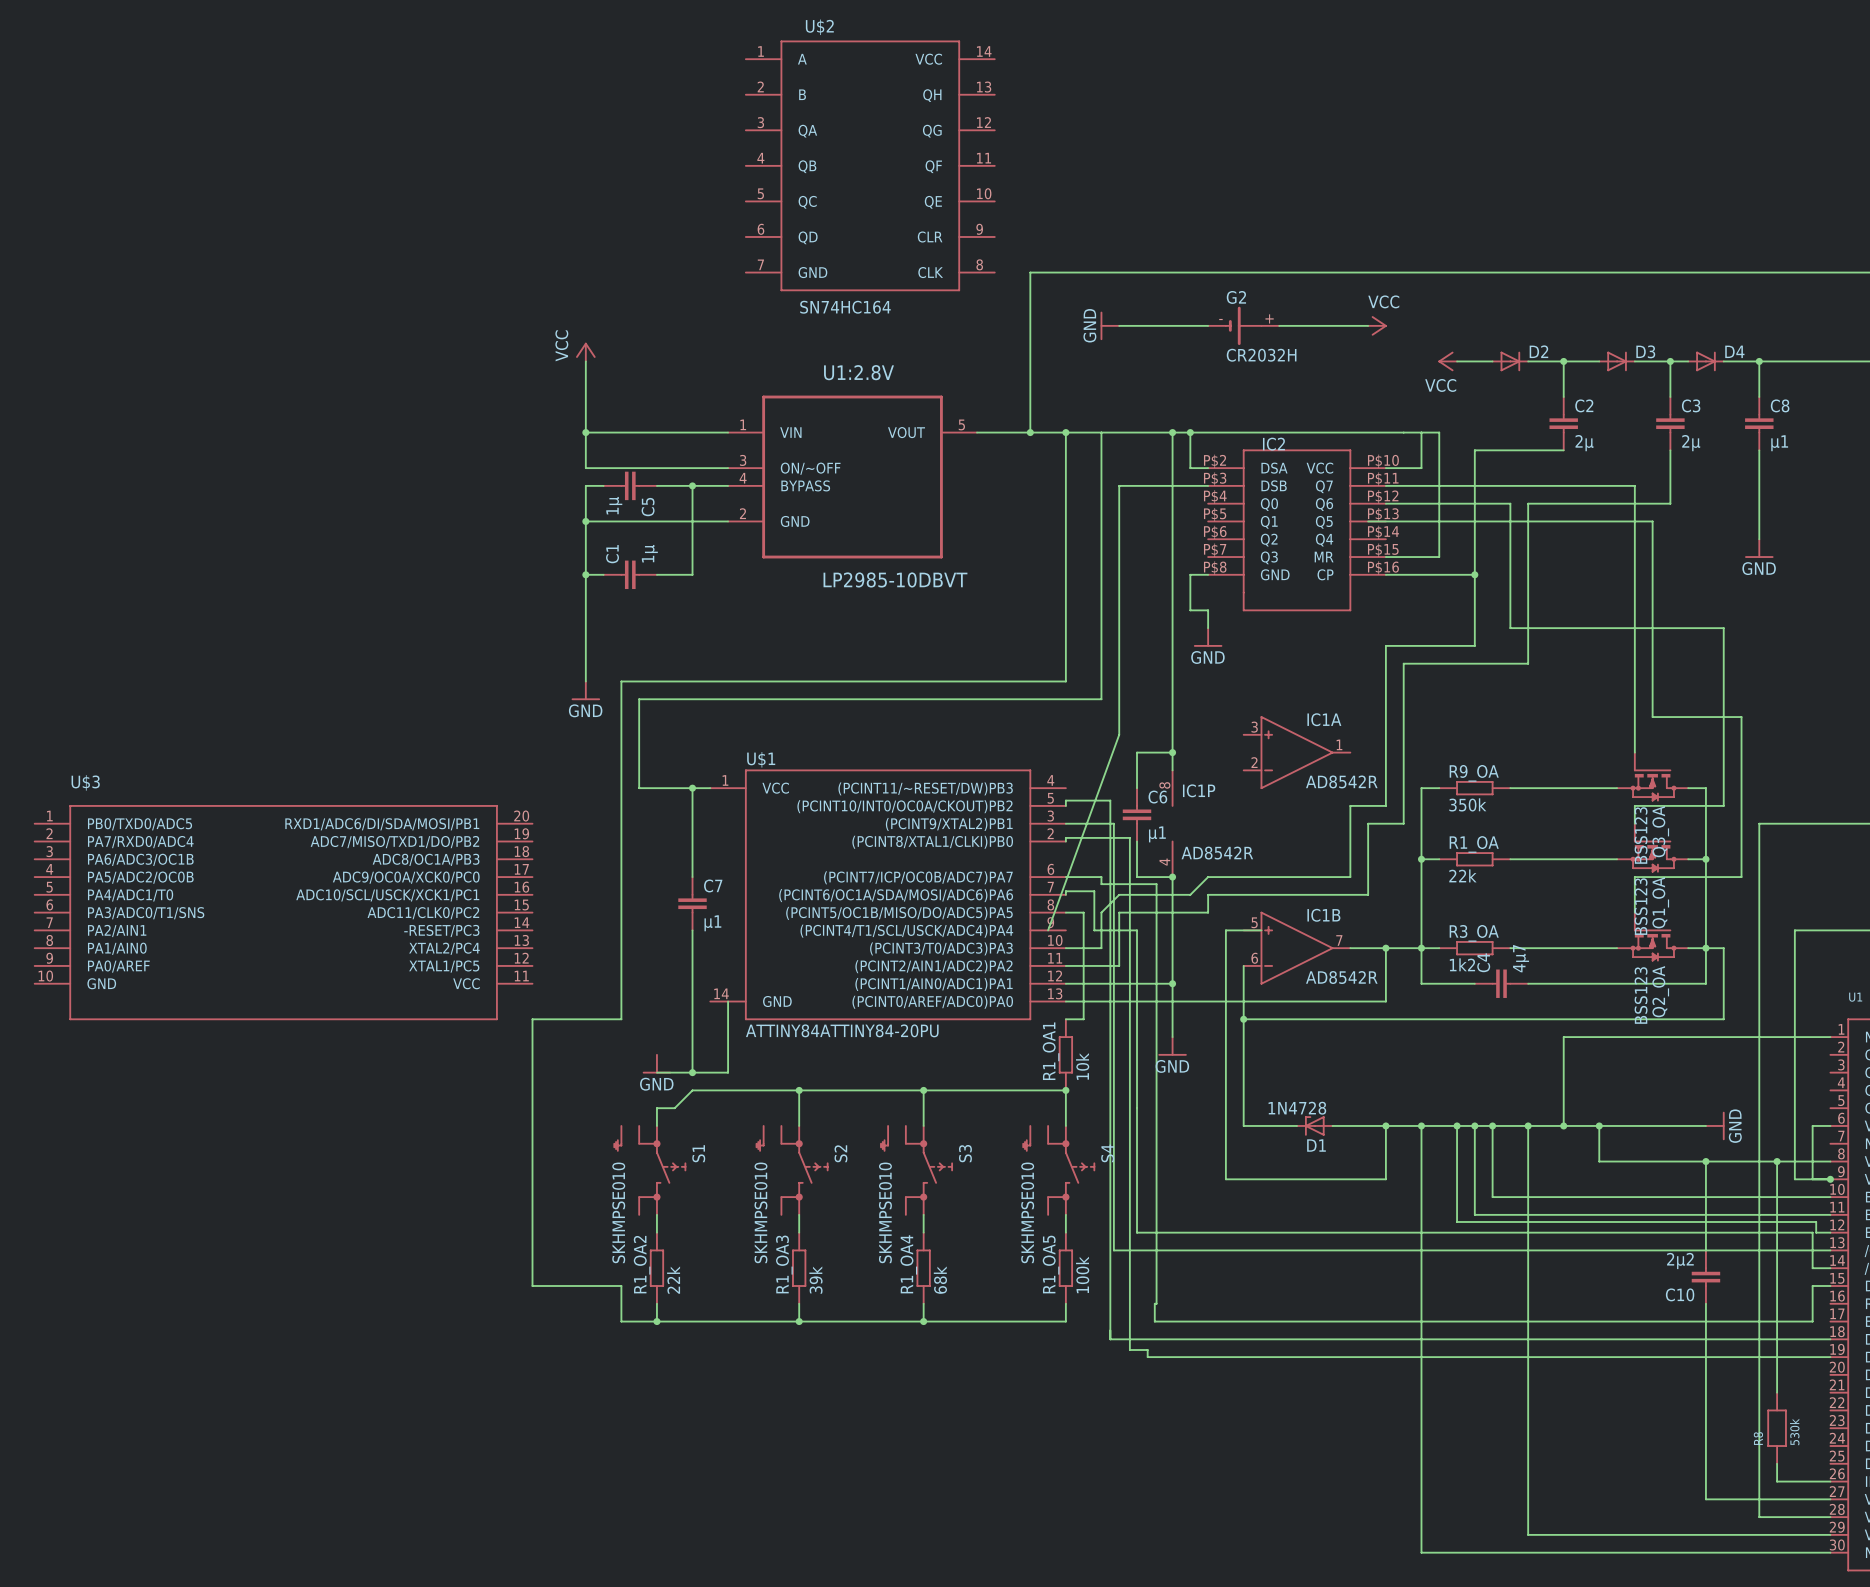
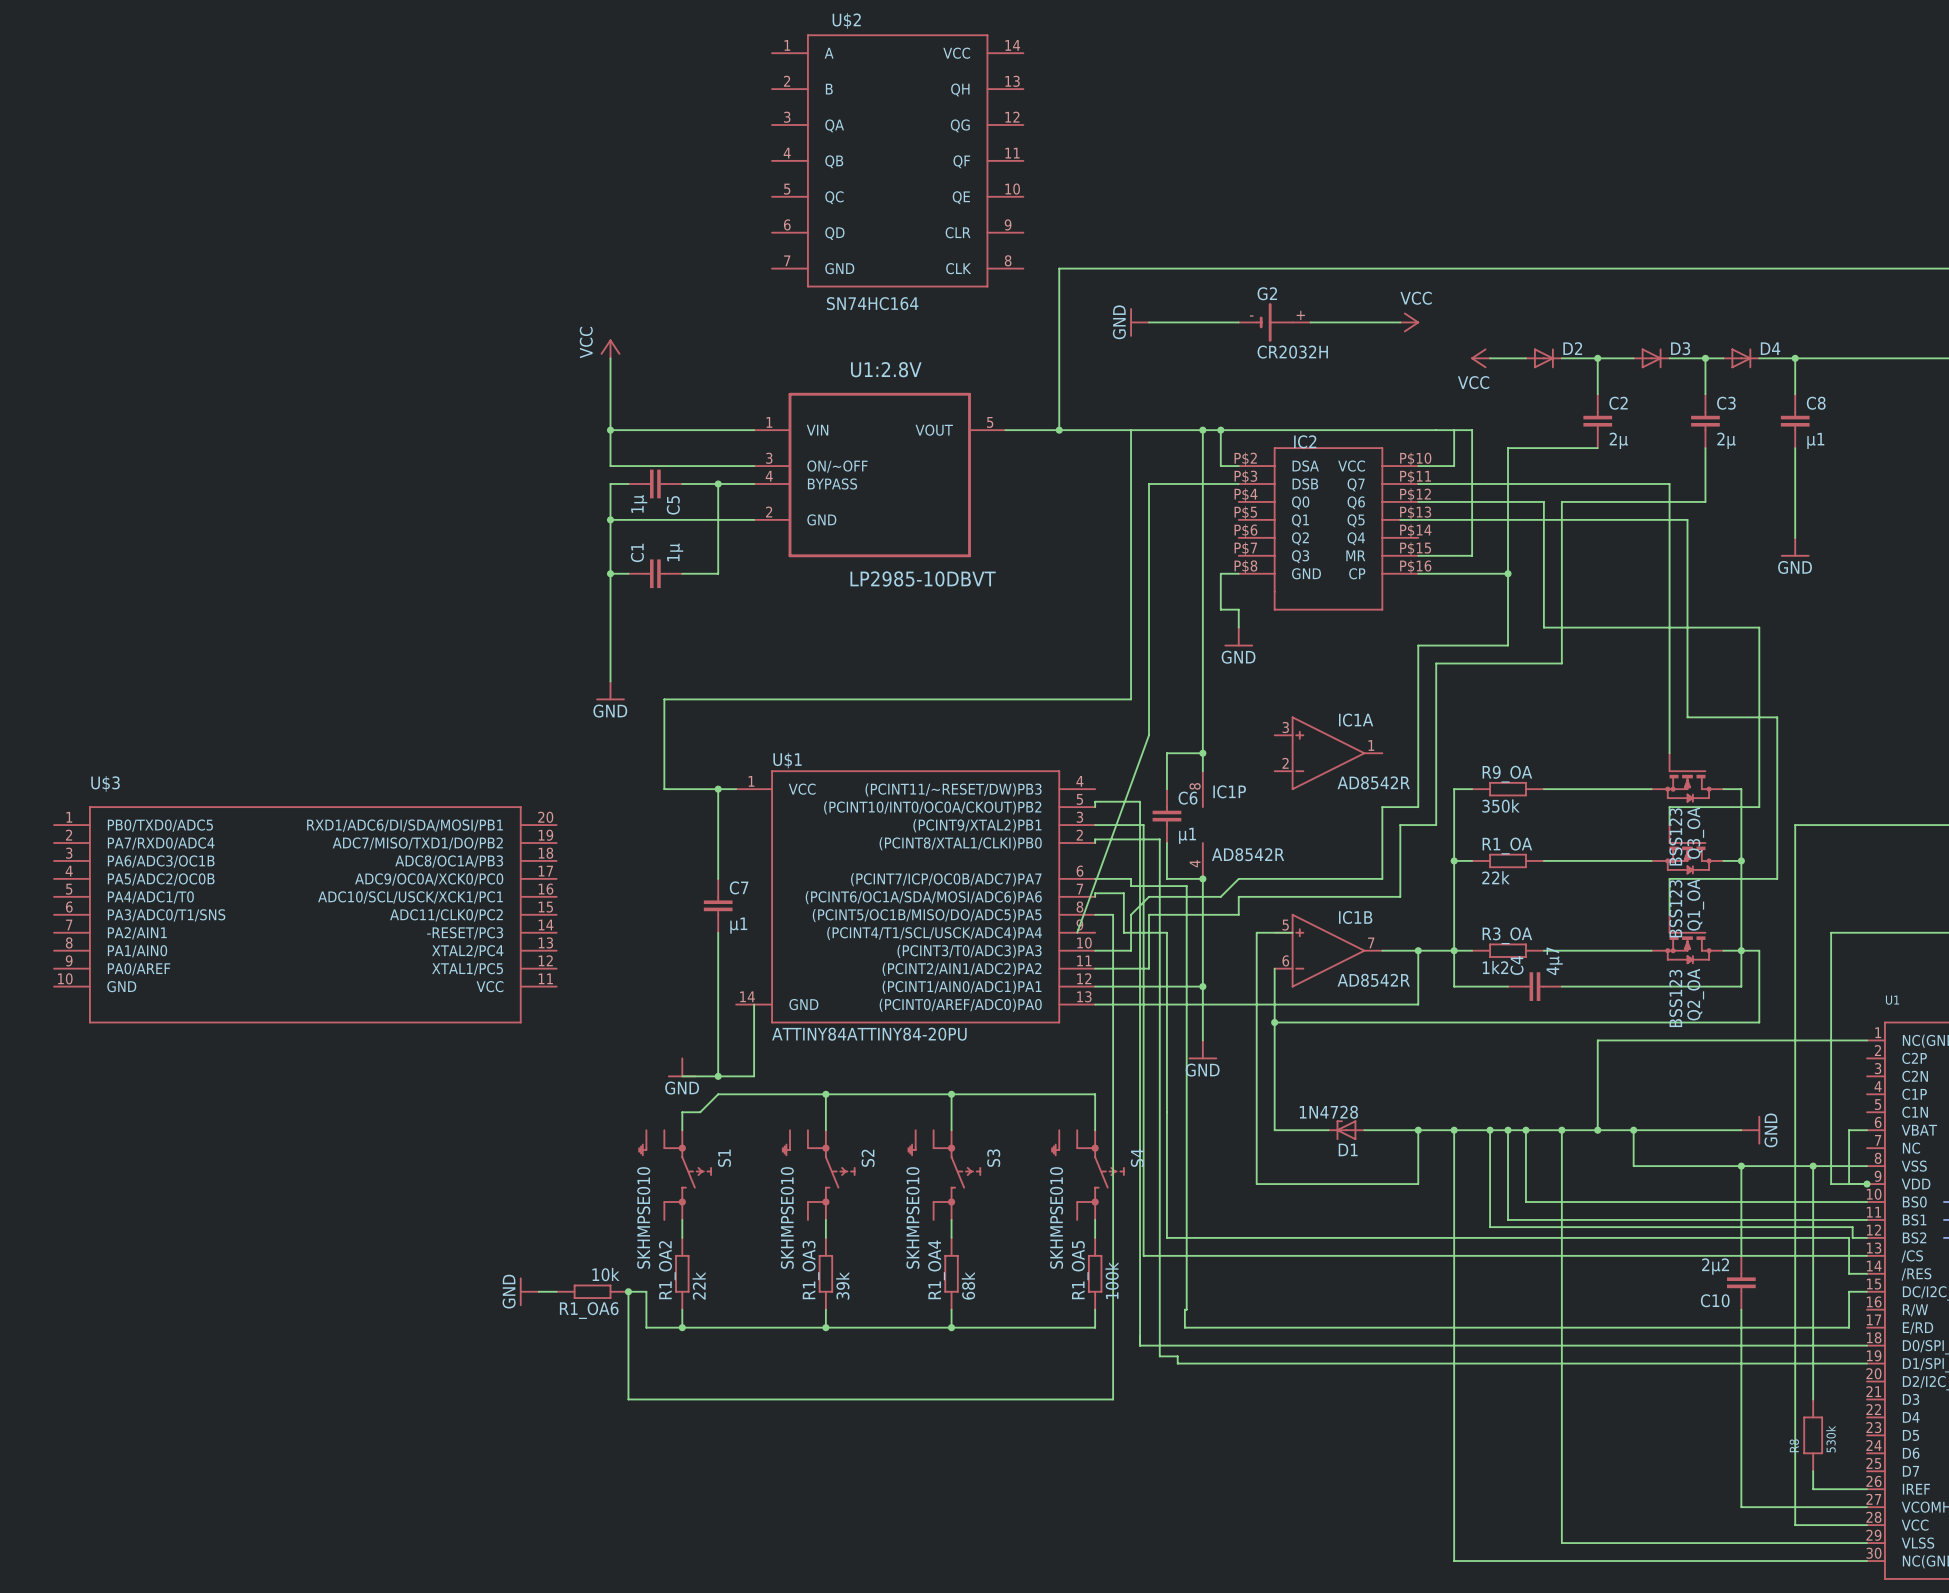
wire: (1065, 432) (1065, 681) (621, 681) (621, 1019) (532, 1019) (532, 1285) (603, 1285) -> none
junction: (1065, 432) -> none
wire: (1065, 1019) (1083, 1019) -> (628, 1291) (628, 1399) (1113, 1399) (1113, 1022)
R1_OA1: 10k (1065, 1054) -> none
junction: (1065, 1090) -> none
power symbol: none -> GND (529, 1291)
wire: none -> (538, 1291) (556, 1291)
R1_OA6: none -> 10k (592, 1291)
junction: none -> (628, 1291)

